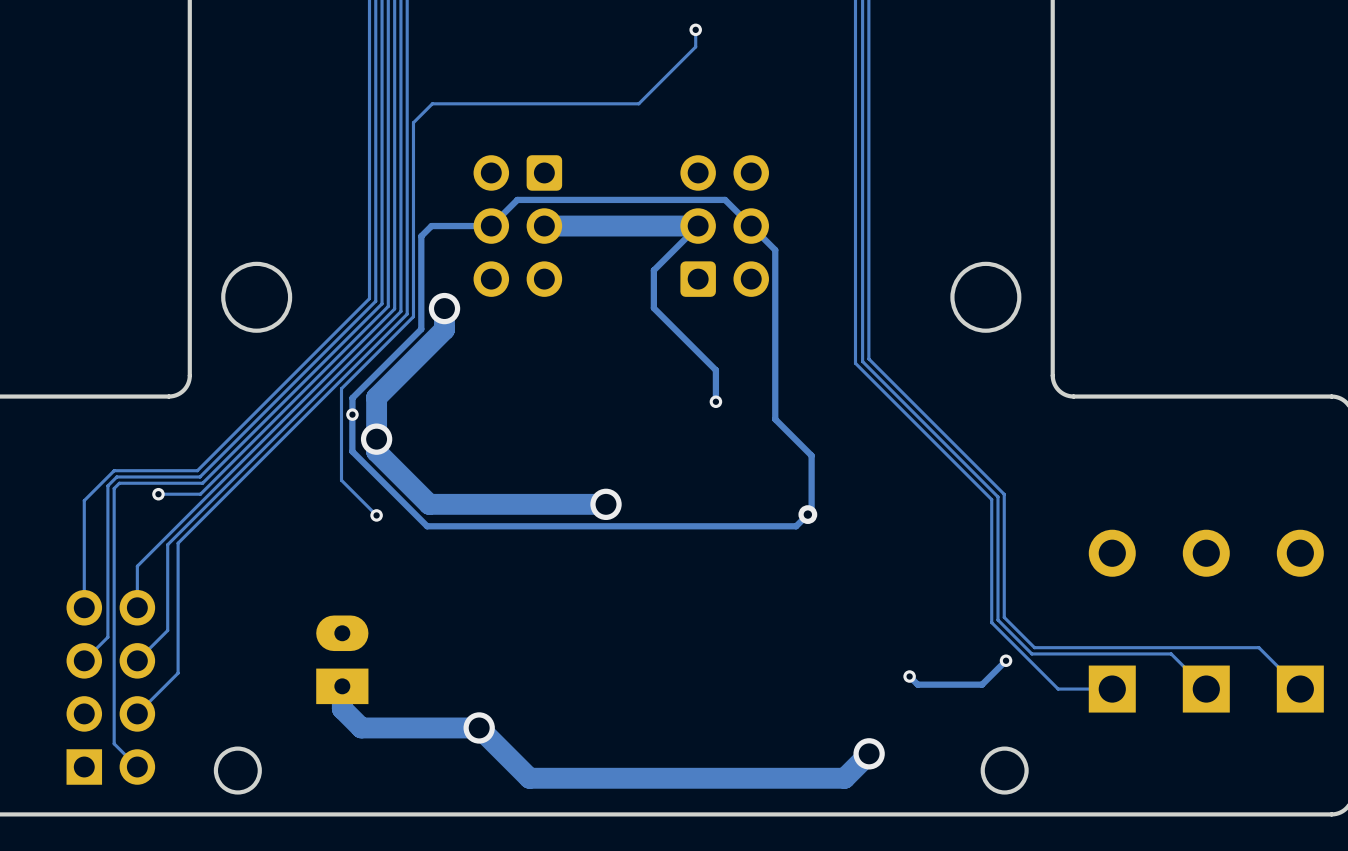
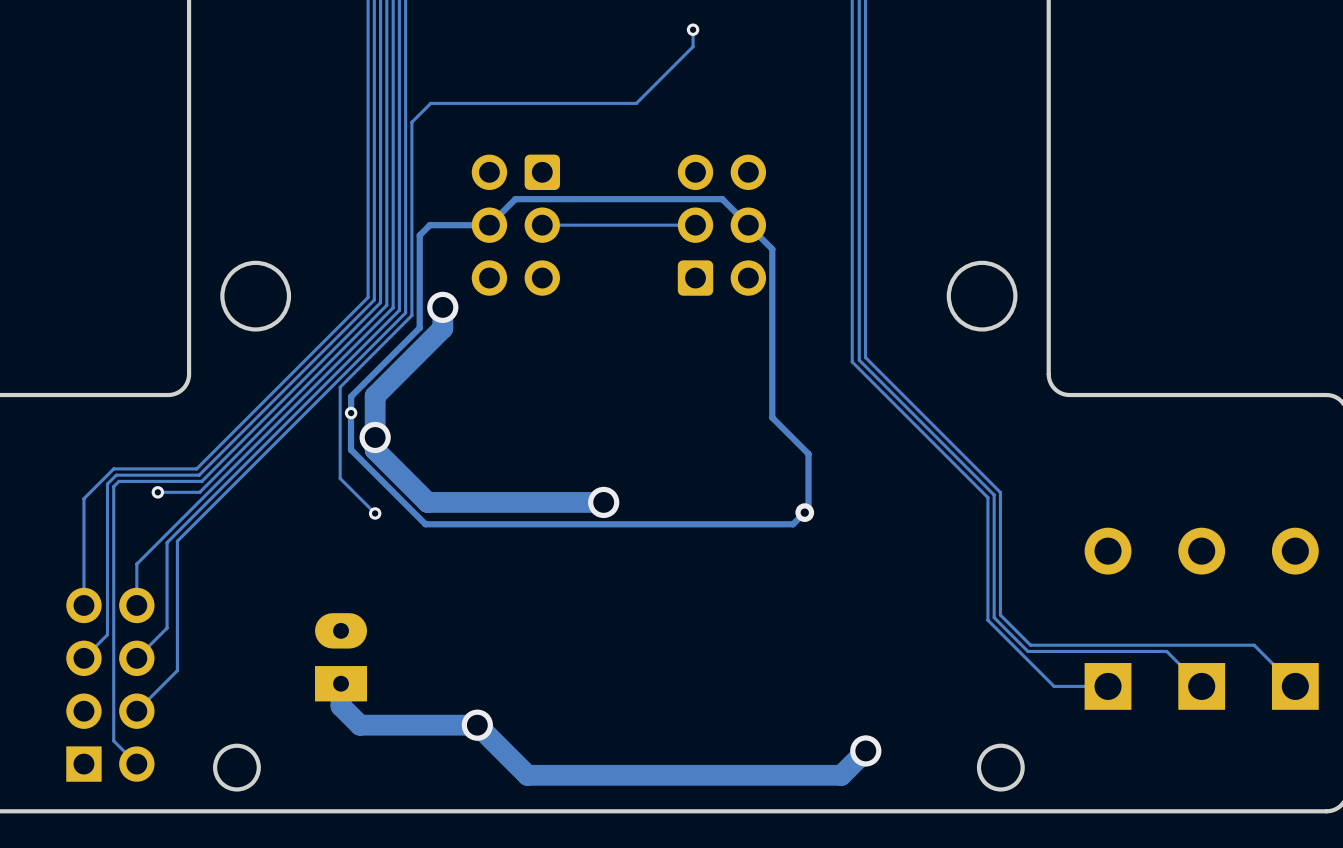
track: (698, 226) (653, 270) (653, 308) (715, 370) (715, 401) -> none
track width: thick (698, 226) (544, 226) -> thin (695, 225) (542, 225)
via: (715, 401) -> none
track: (1006, 660) (982, 684) (917, 684) (909, 676) -> none
via: (1006, 660) -> none
via: (909, 676) -> none

